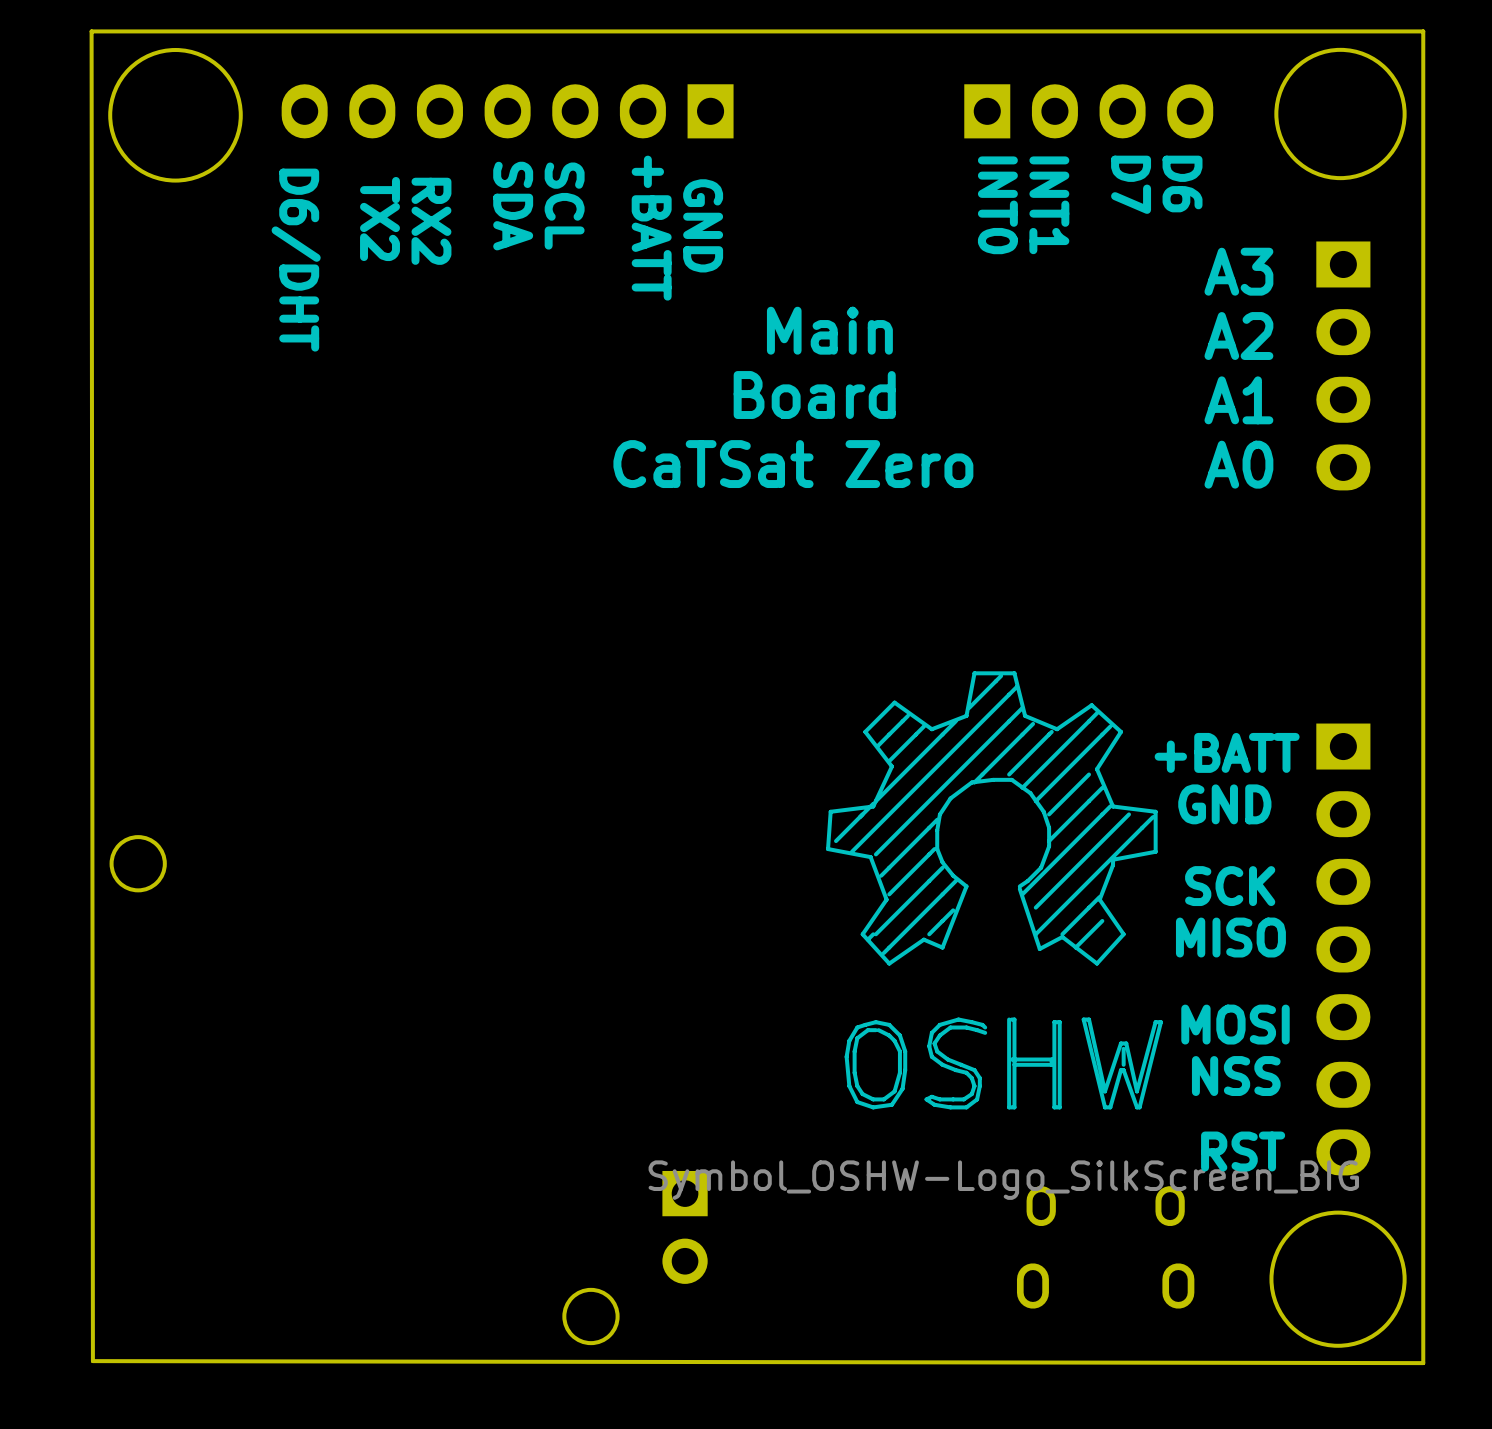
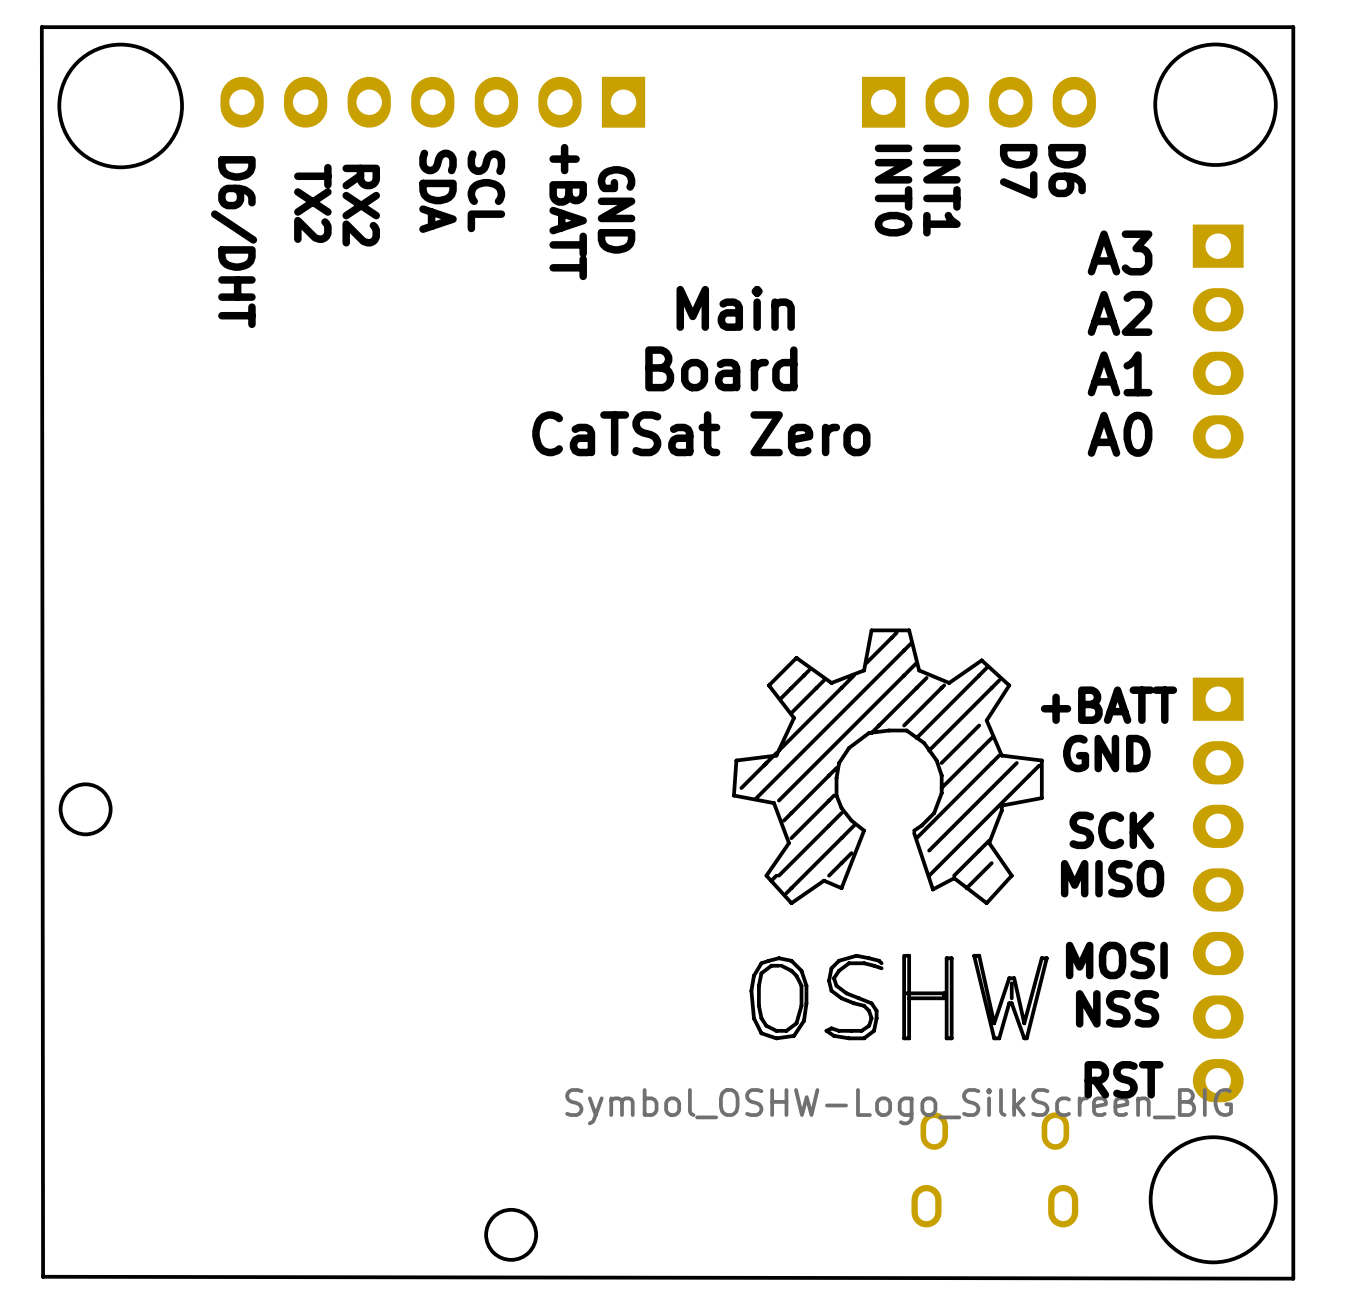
part: (685, 1227) -> none

